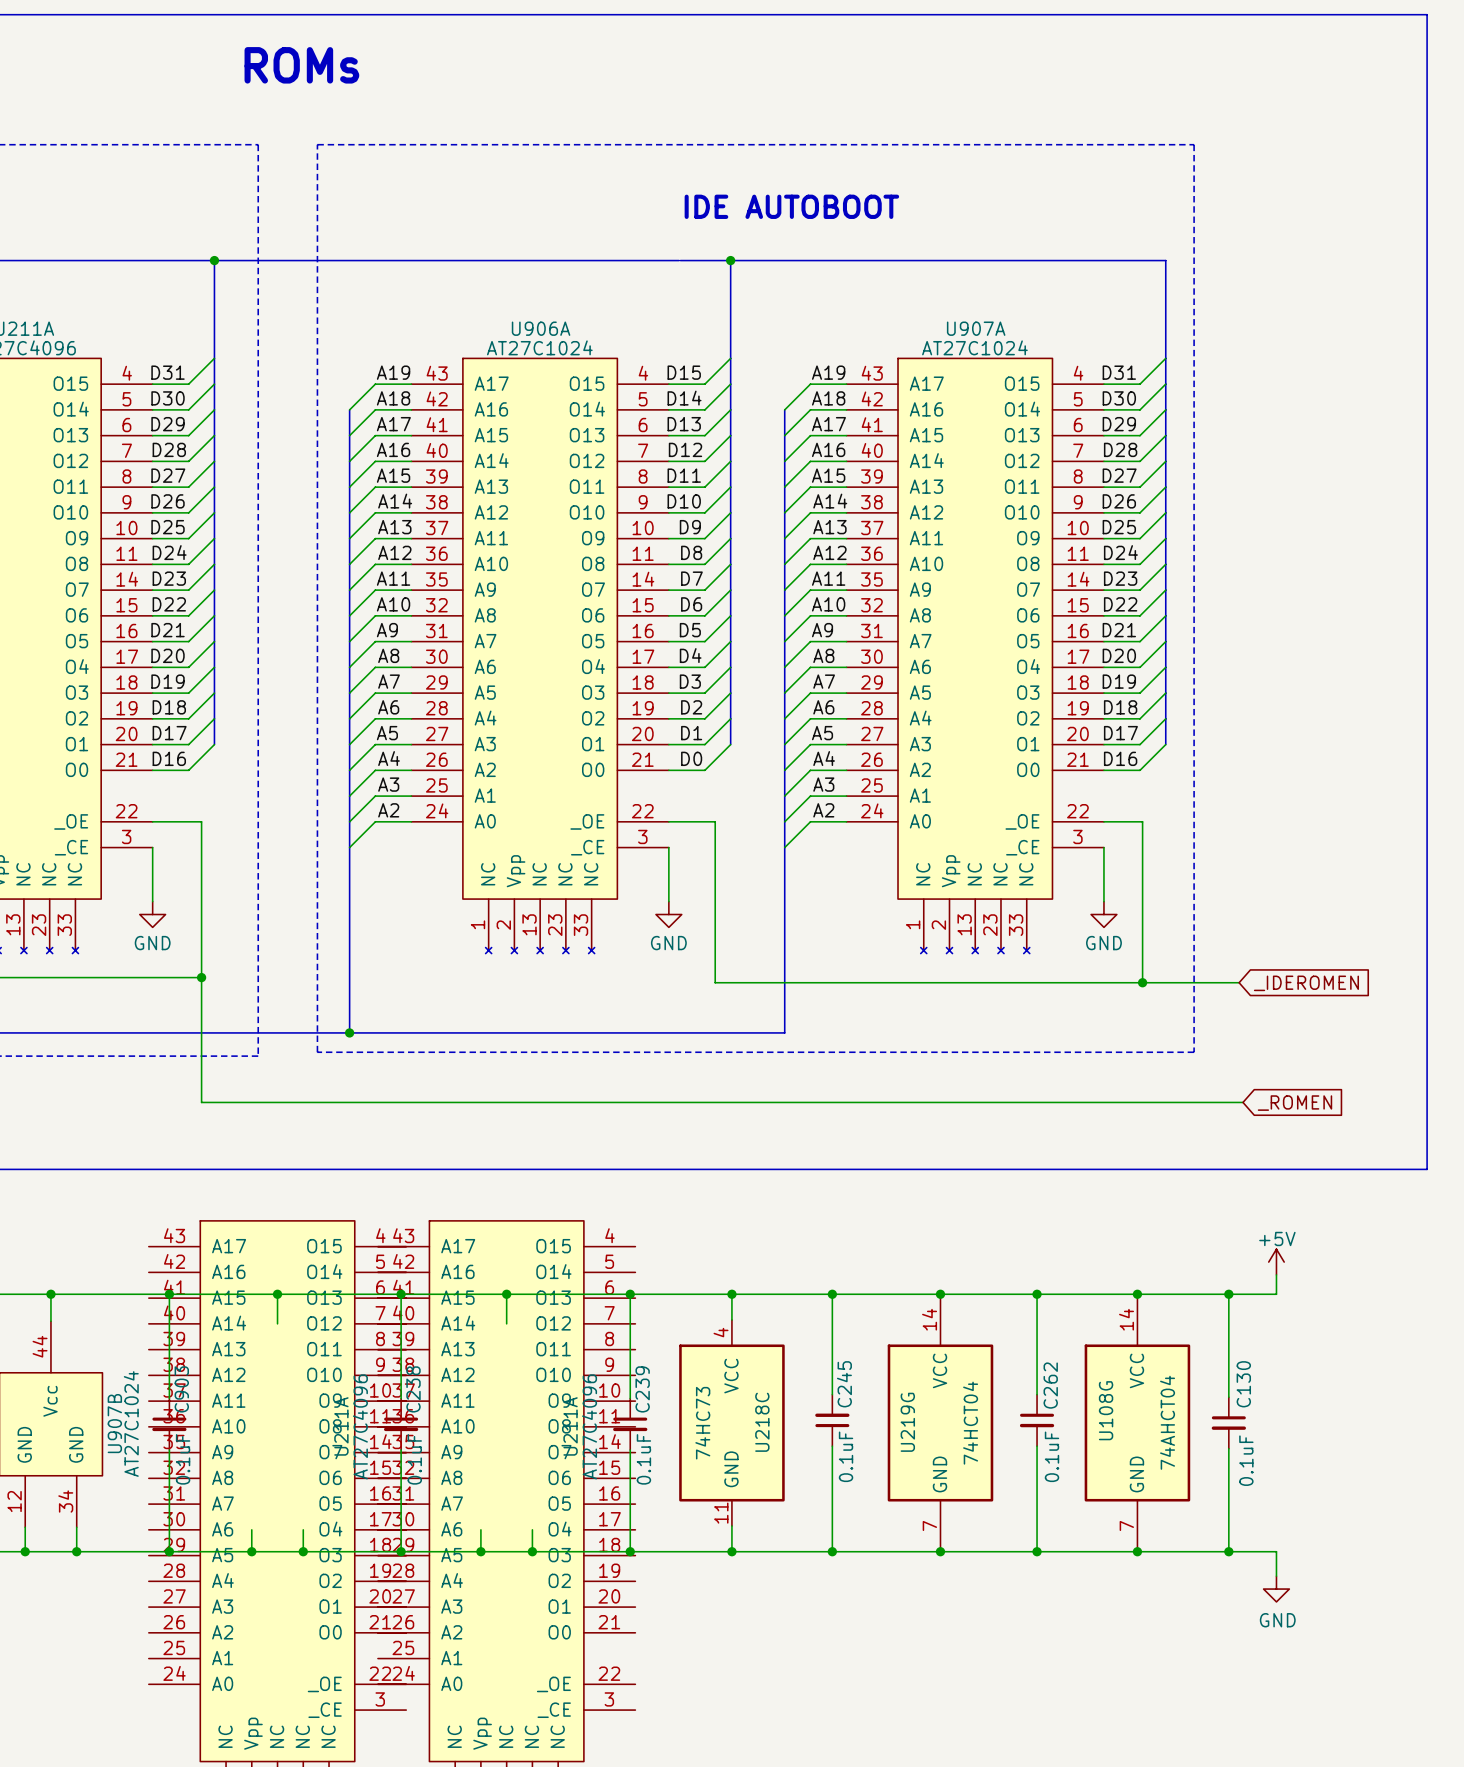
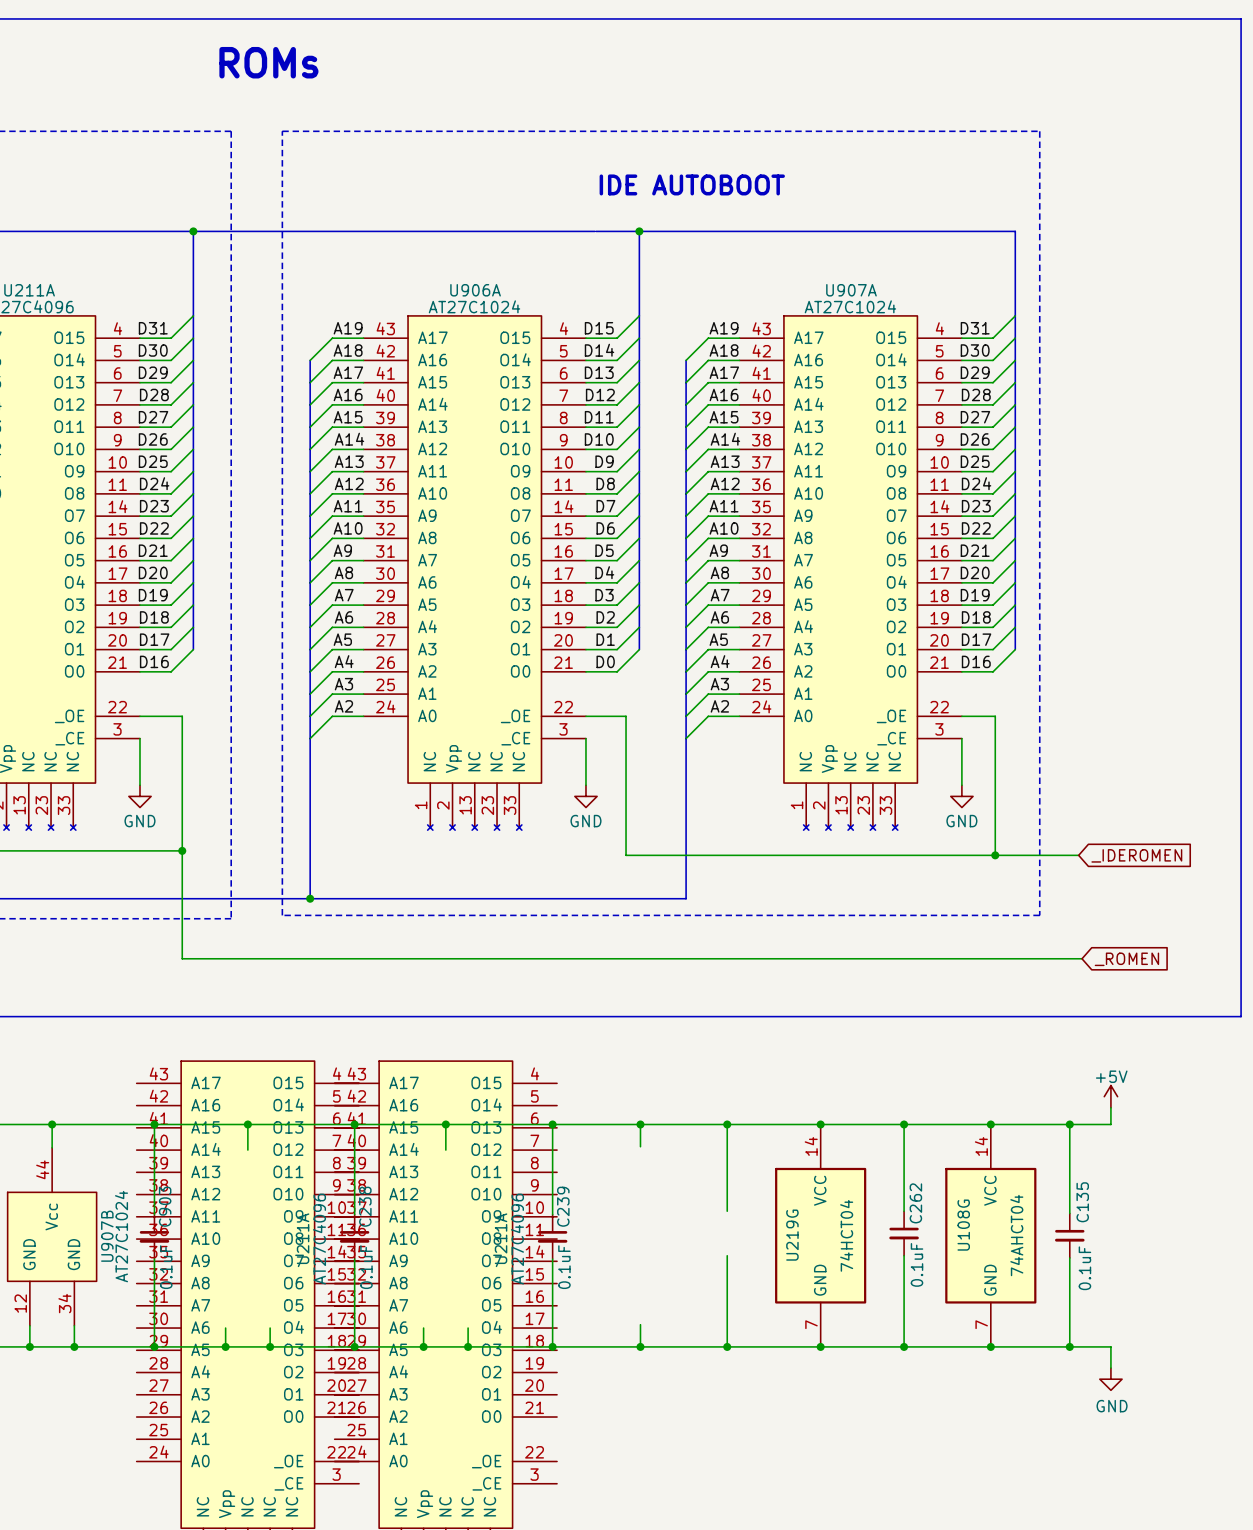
C130 name: C130 (1243, 1384) -> C135 (1082, 1202)
C245: 0.1uF (832, 1420) -> none
U218C: 74HC73 (731, 1422) -> none

